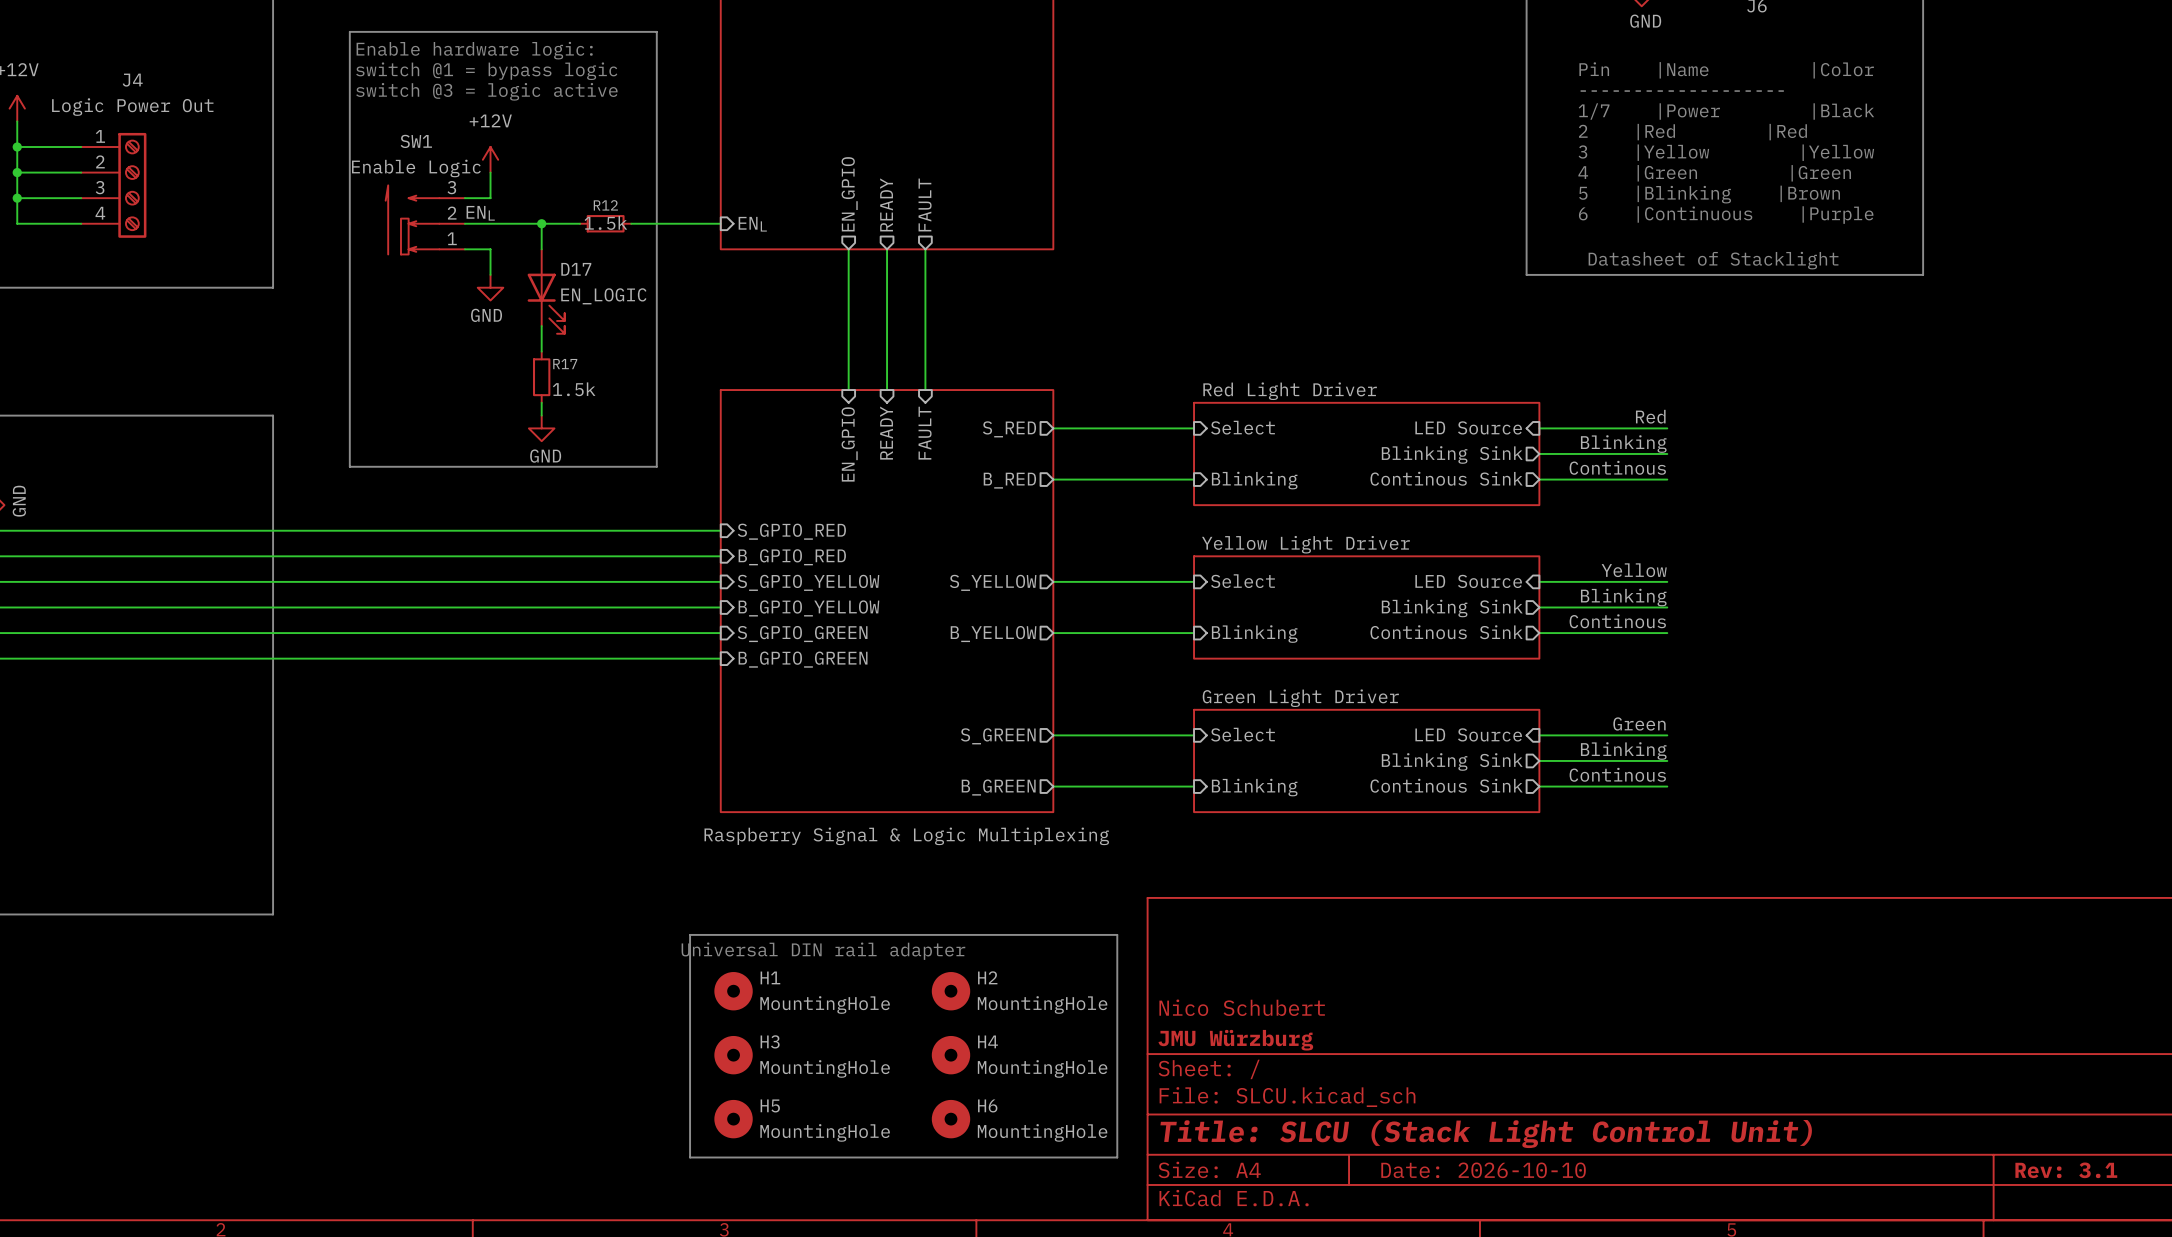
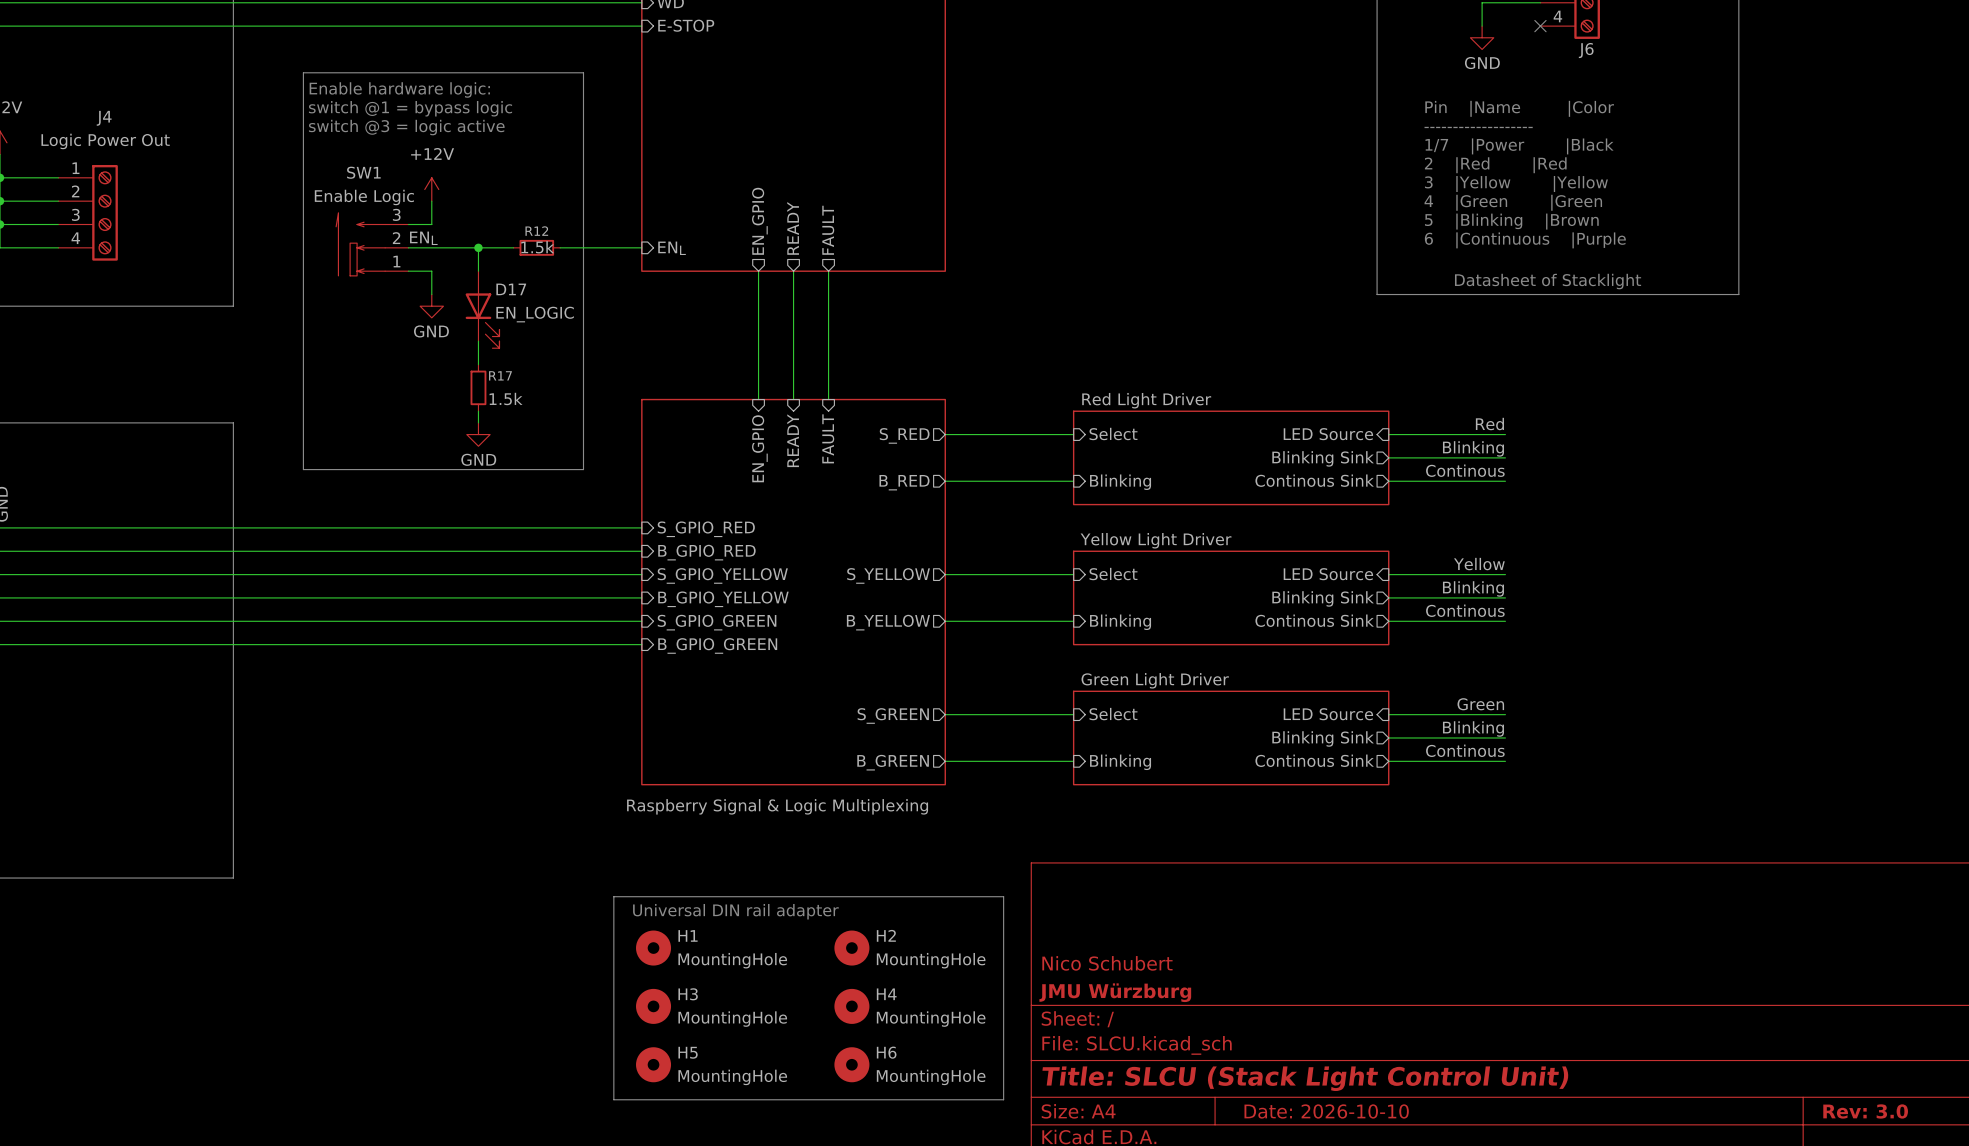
title block: Rev: 3.1 (2066, 1170) -> Rev: 3.0 (1865, 1111)

